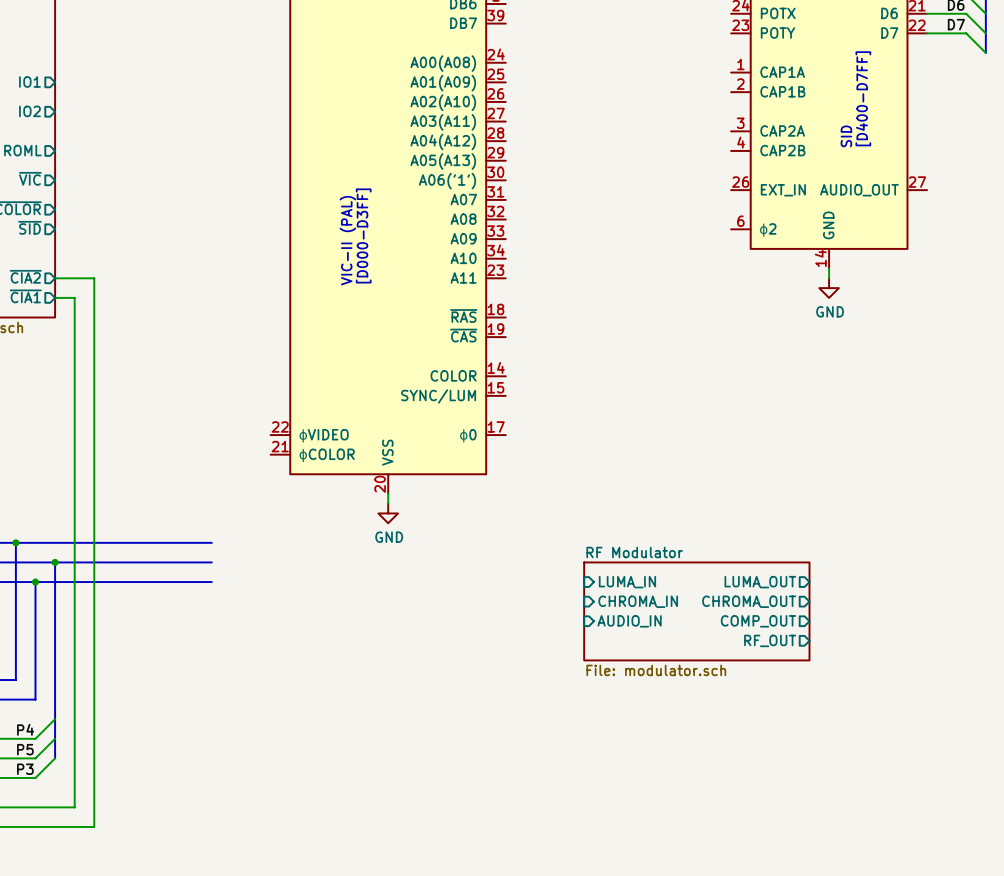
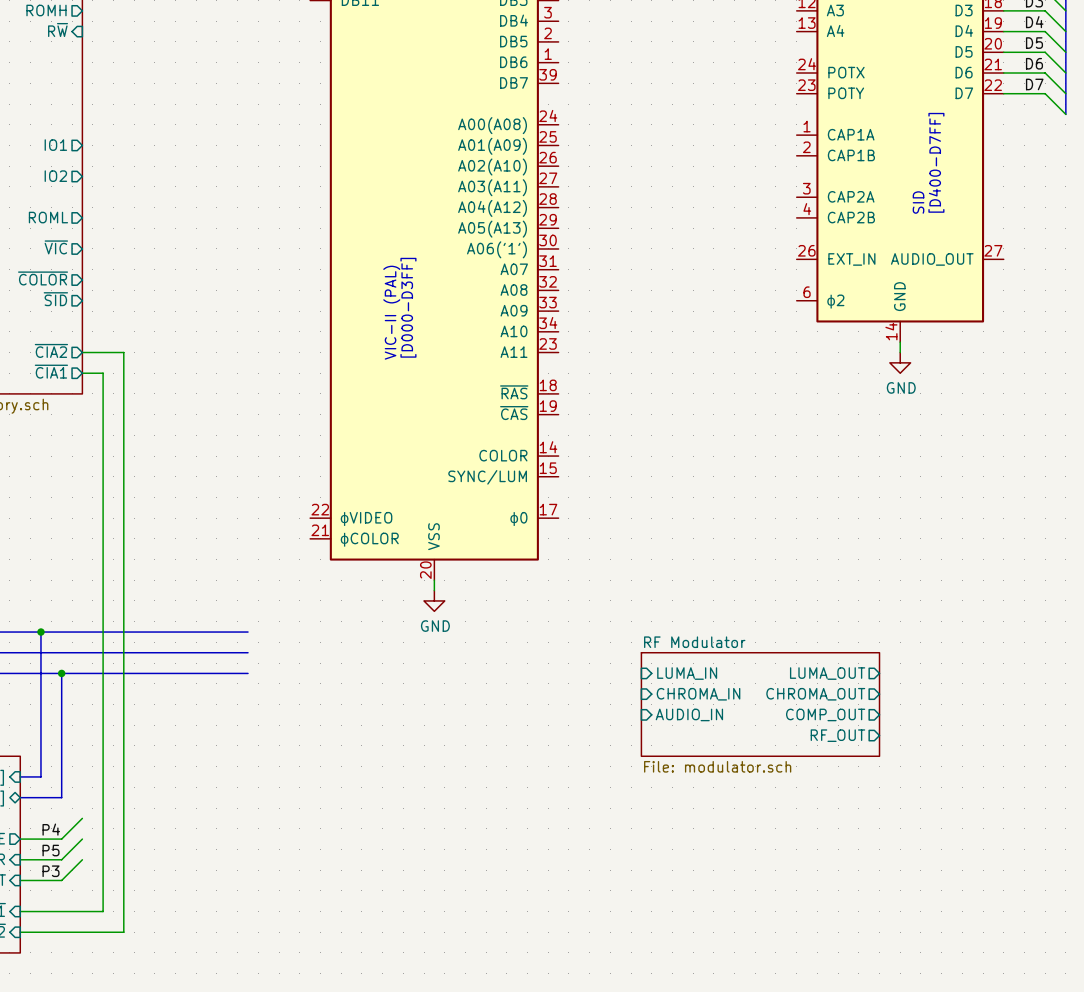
bus: (55, 562) (55, 758) -> none
junction: (55, 562) -> none

